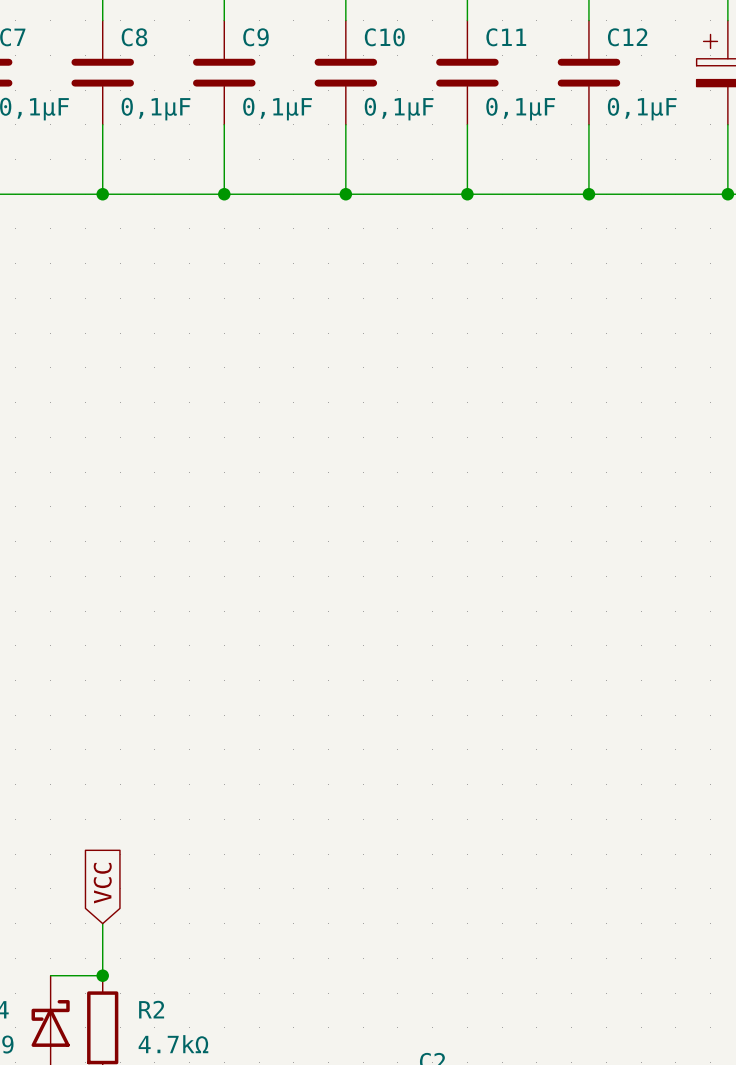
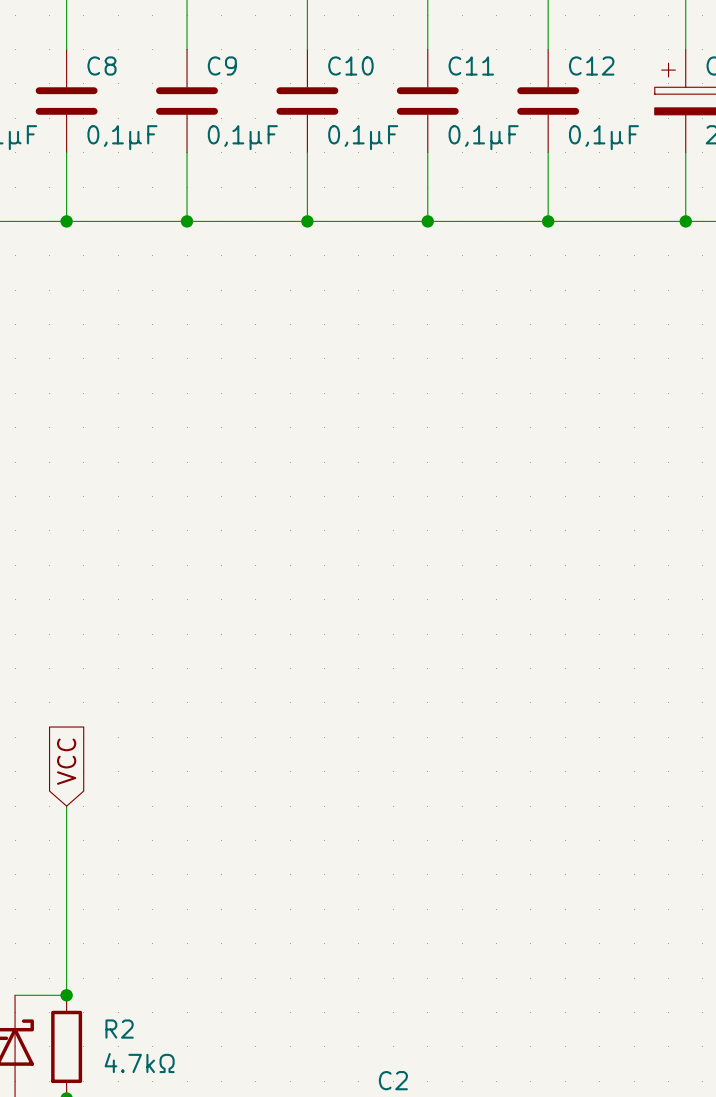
wire: none -> (66, 806) (66, 943)
global label position: VCC (102, 883) -> VCC (66, 761)

